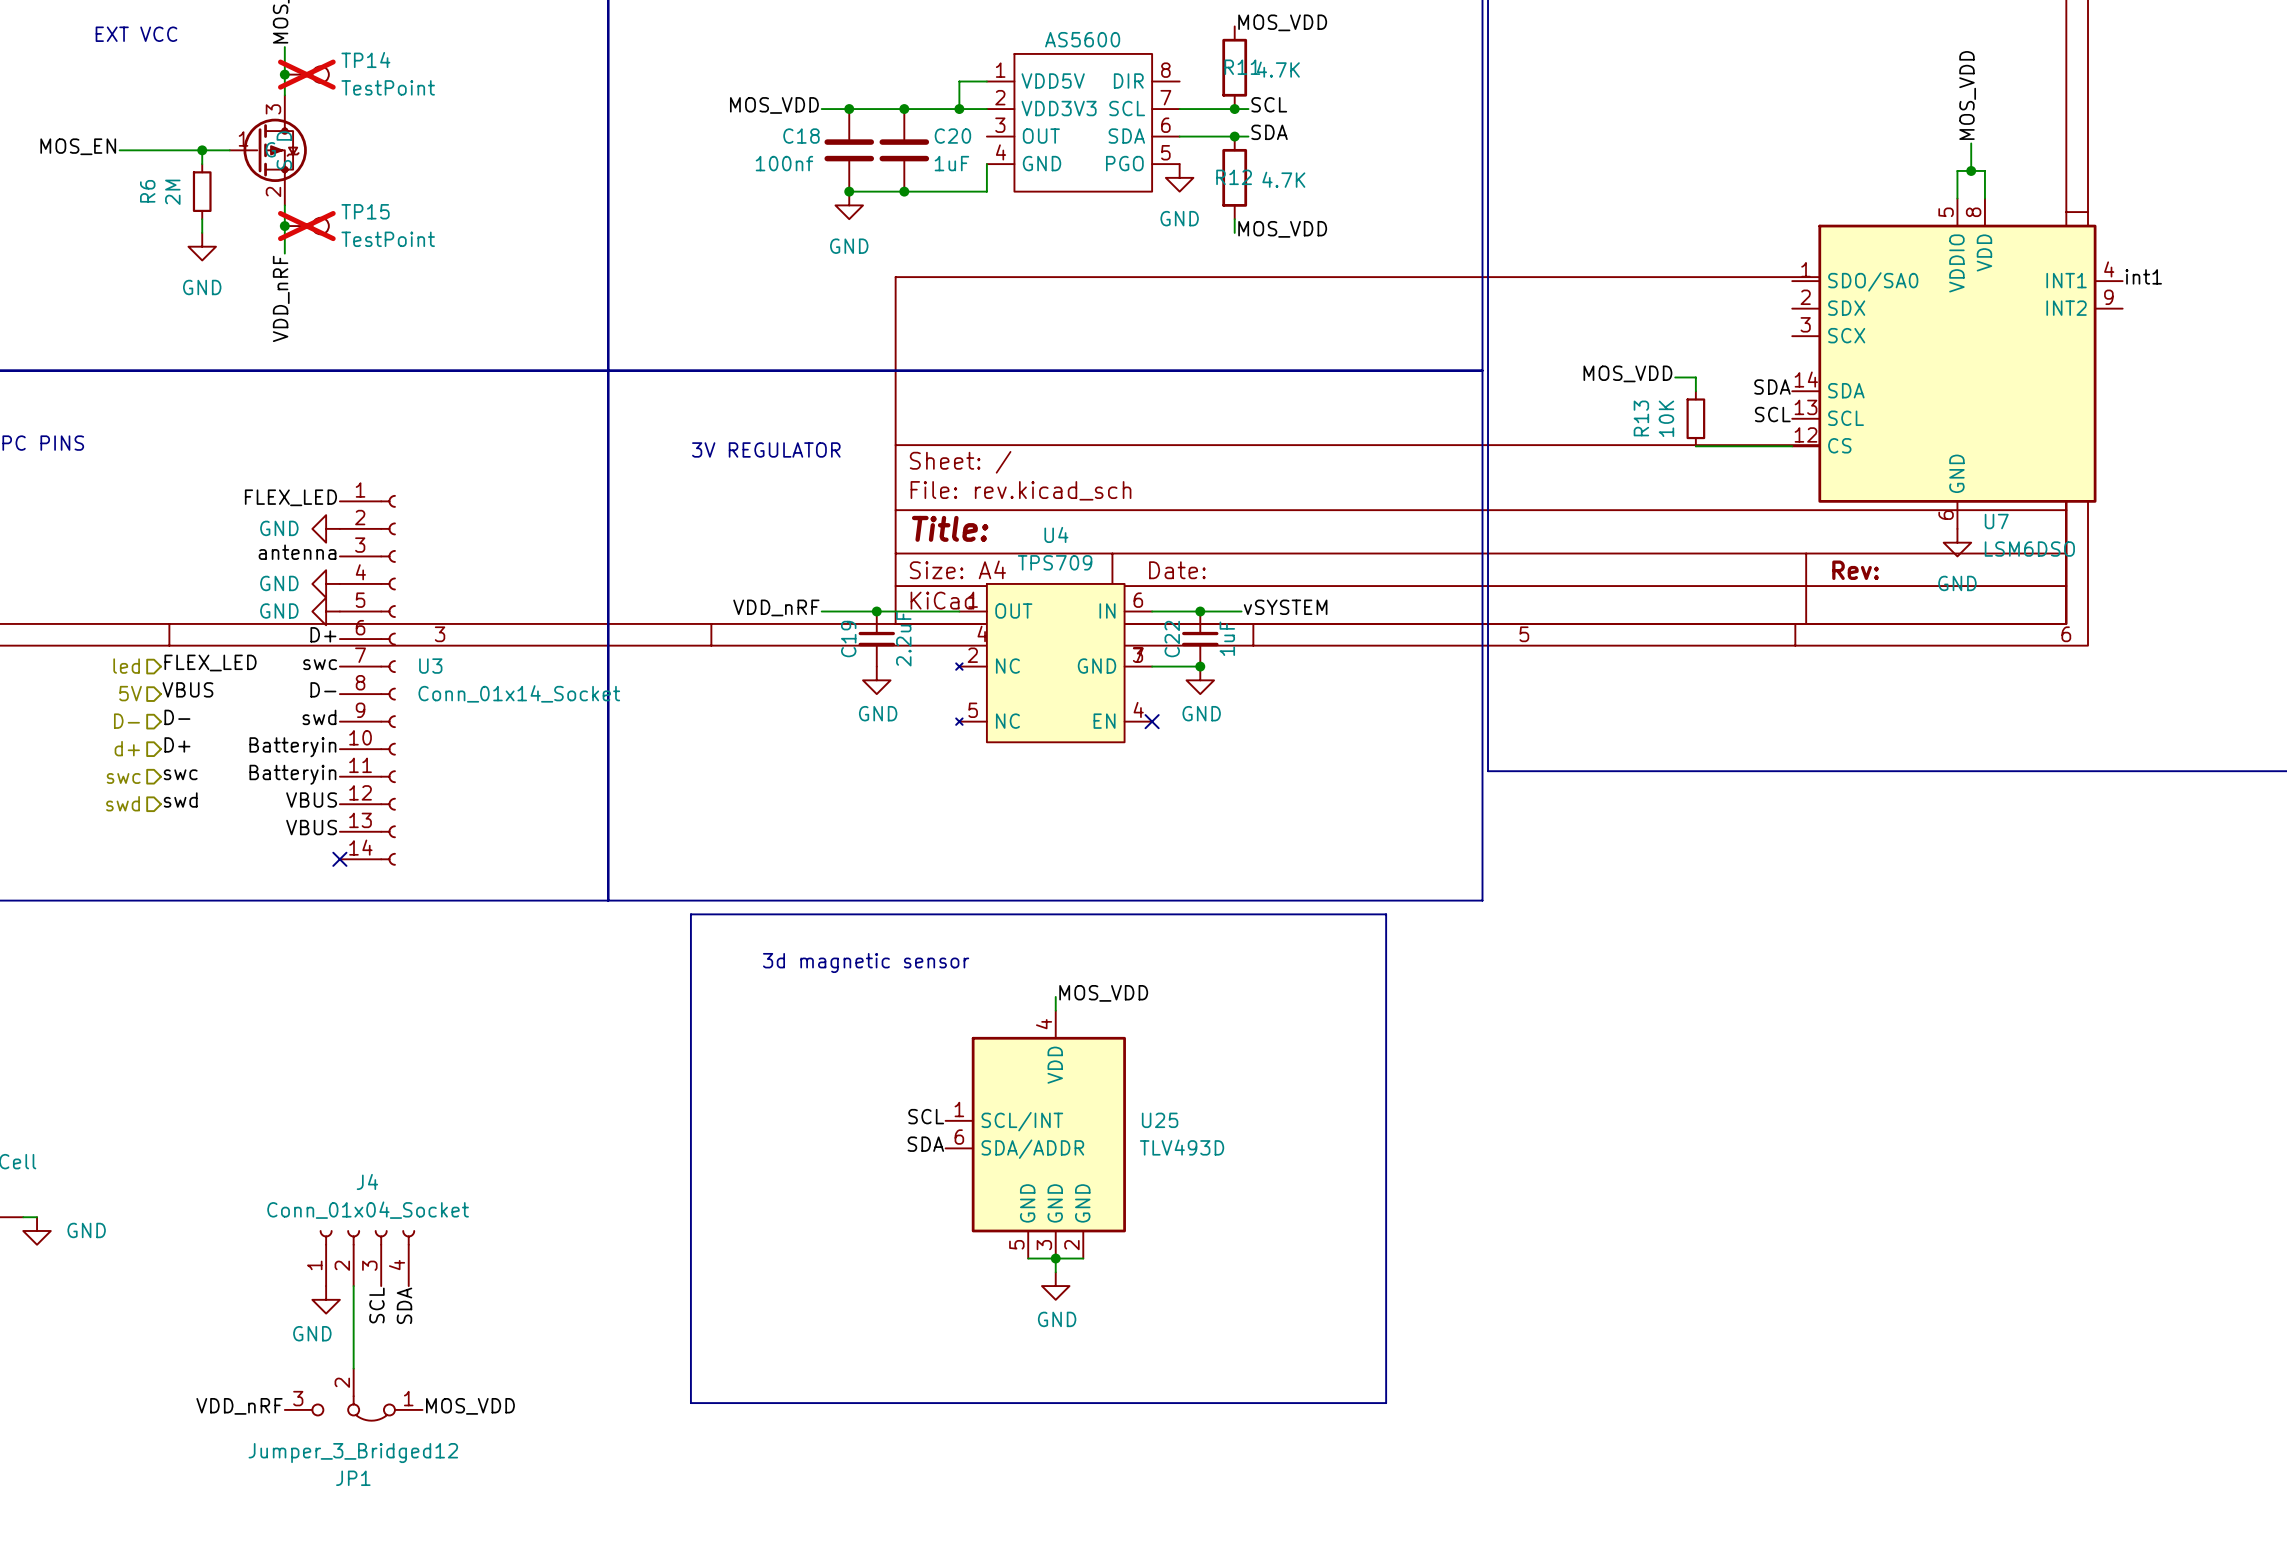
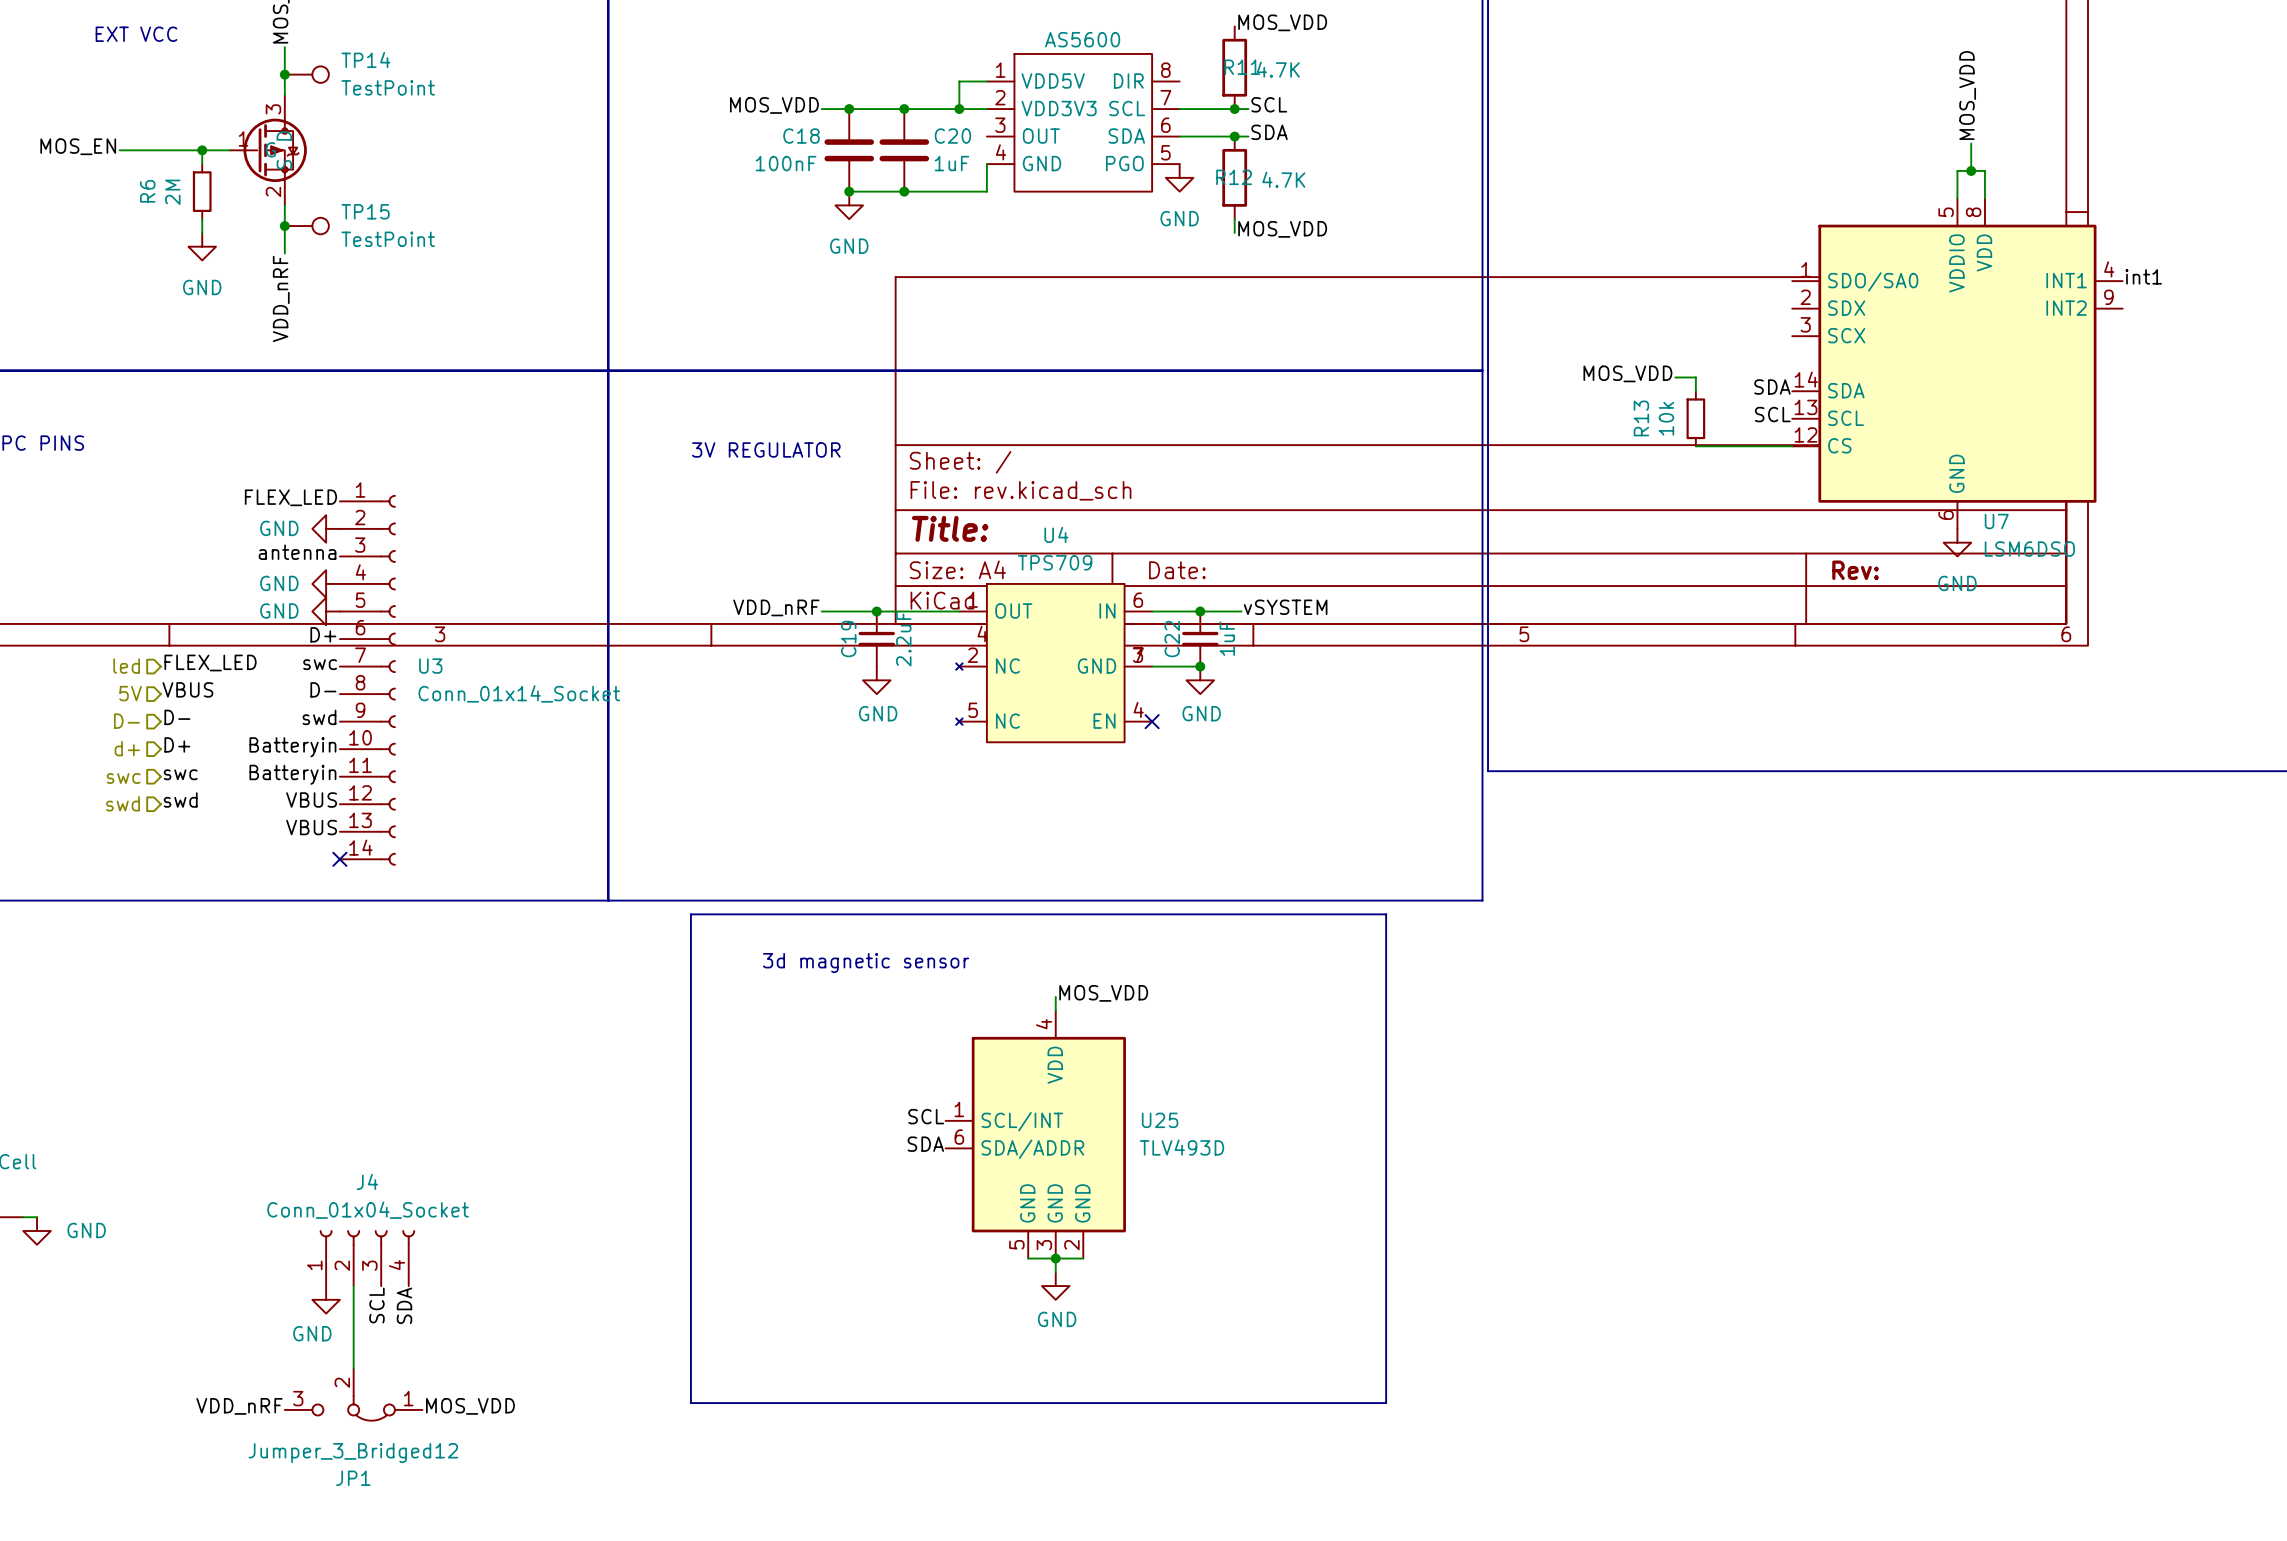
TP14 do-not-place cross: (306, 74) -> none
C18 value: 100nf (784, 163) -> 100nF (786, 163)
TP15 do-not-place cross: (306, 226) -> none
R13 value: 10K (1666, 418) -> 10k (1666, 418)

